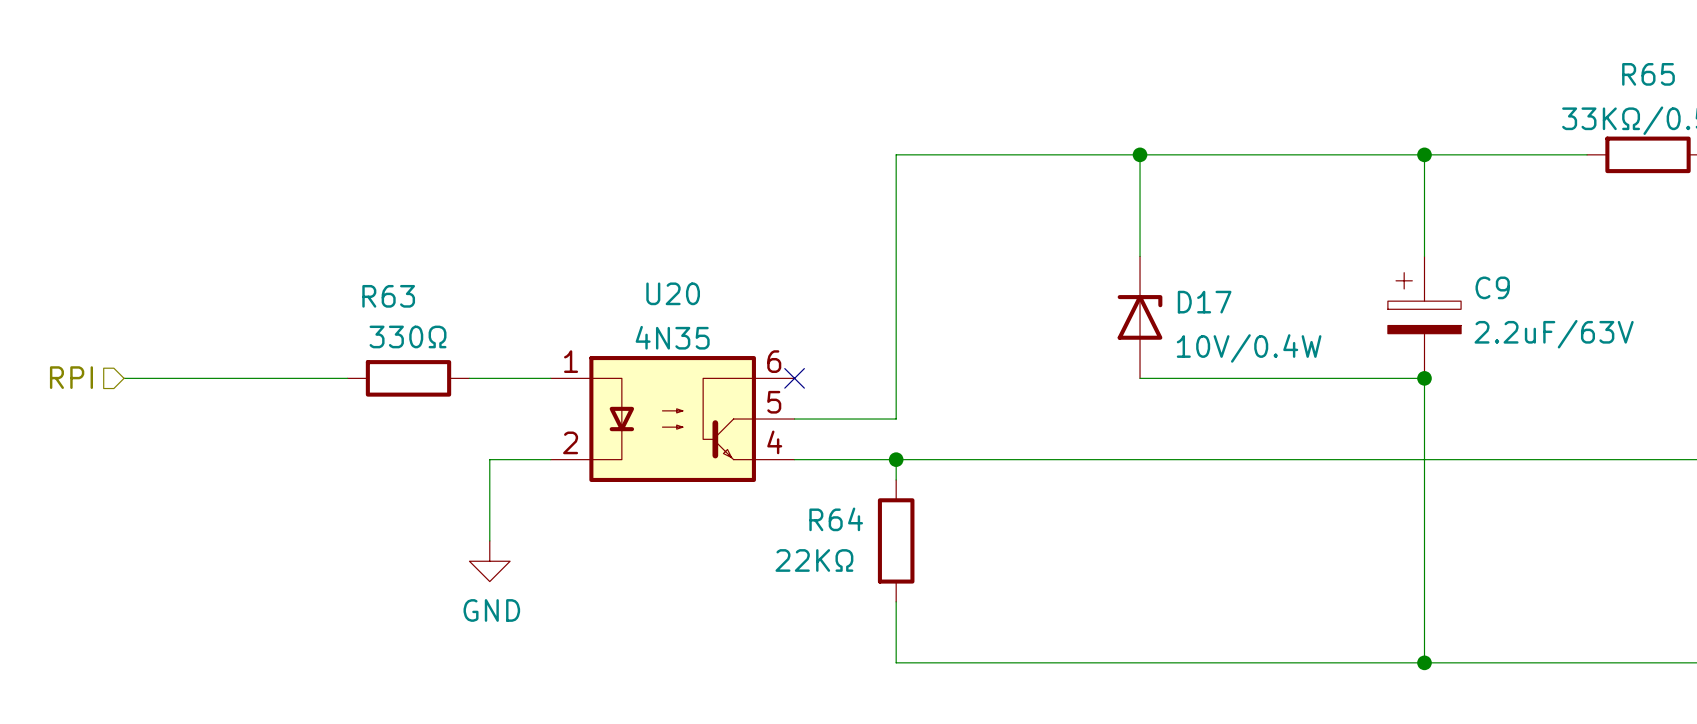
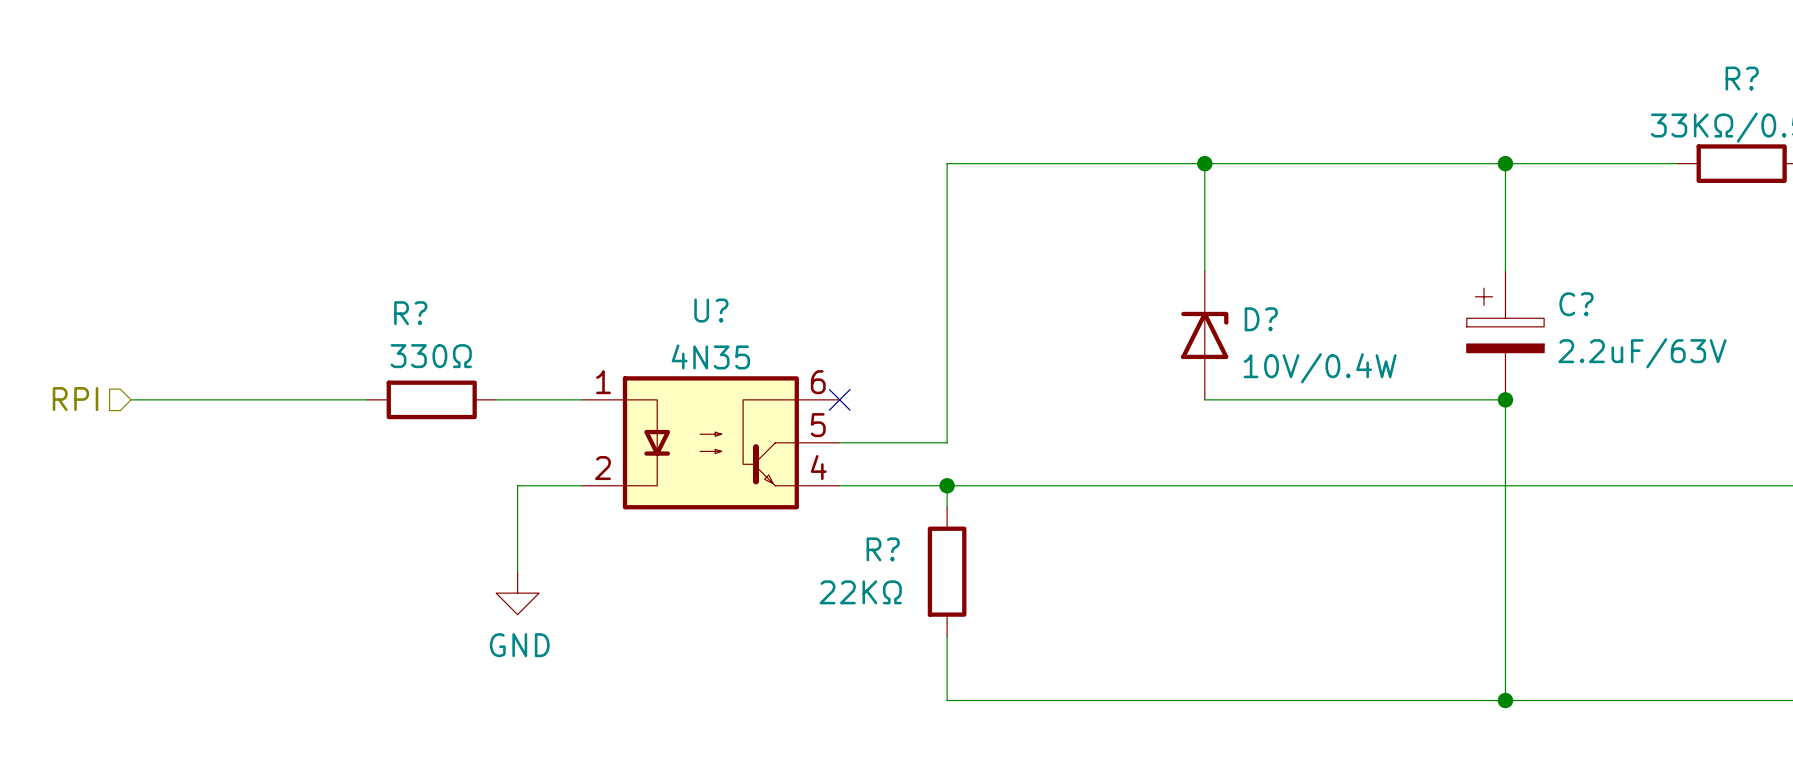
R65 name: R65 (1648, 74) -> R? (1742, 78)
C9 name: C9 (1492, 287) -> C? (1576, 304)
U20 name: U20 (673, 293) -> U? (711, 310)
R63 name: R63 (388, 296) -> R? (410, 313)
D17 name: D17 (1204, 302) -> D? (1261, 319)
R64 name: R64 (836, 519) -> R? (883, 549)

